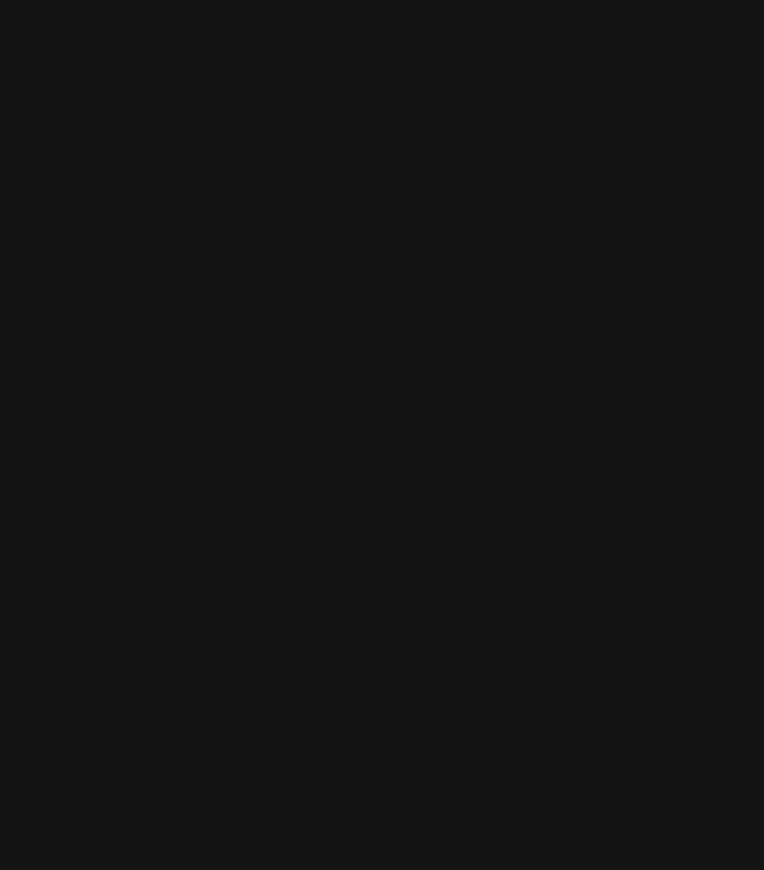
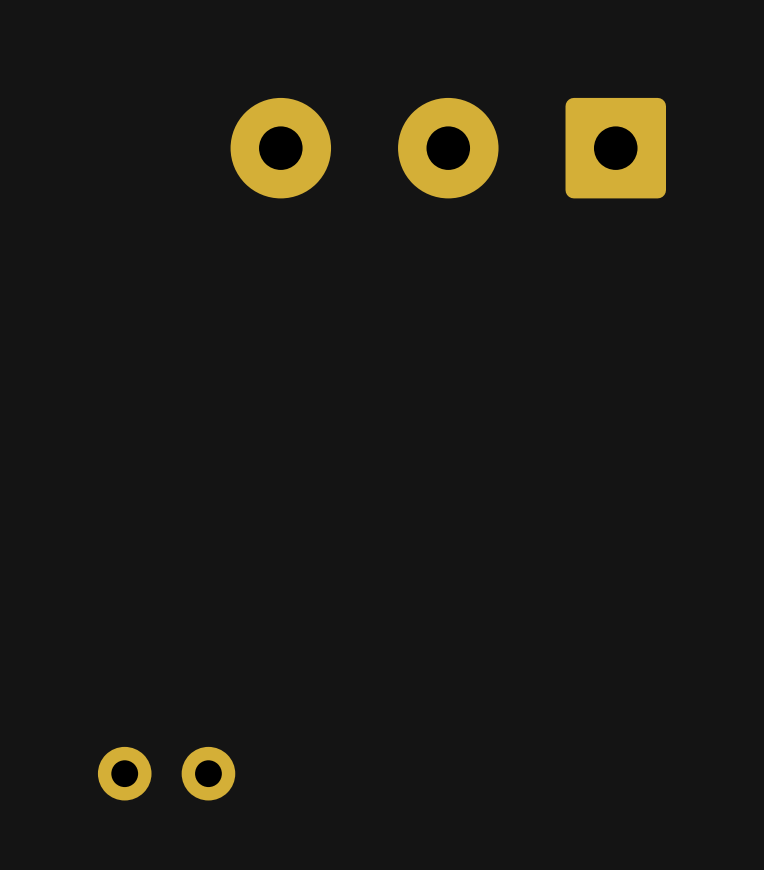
part: none -> (448, 148)
part: none -> (166, 773)

